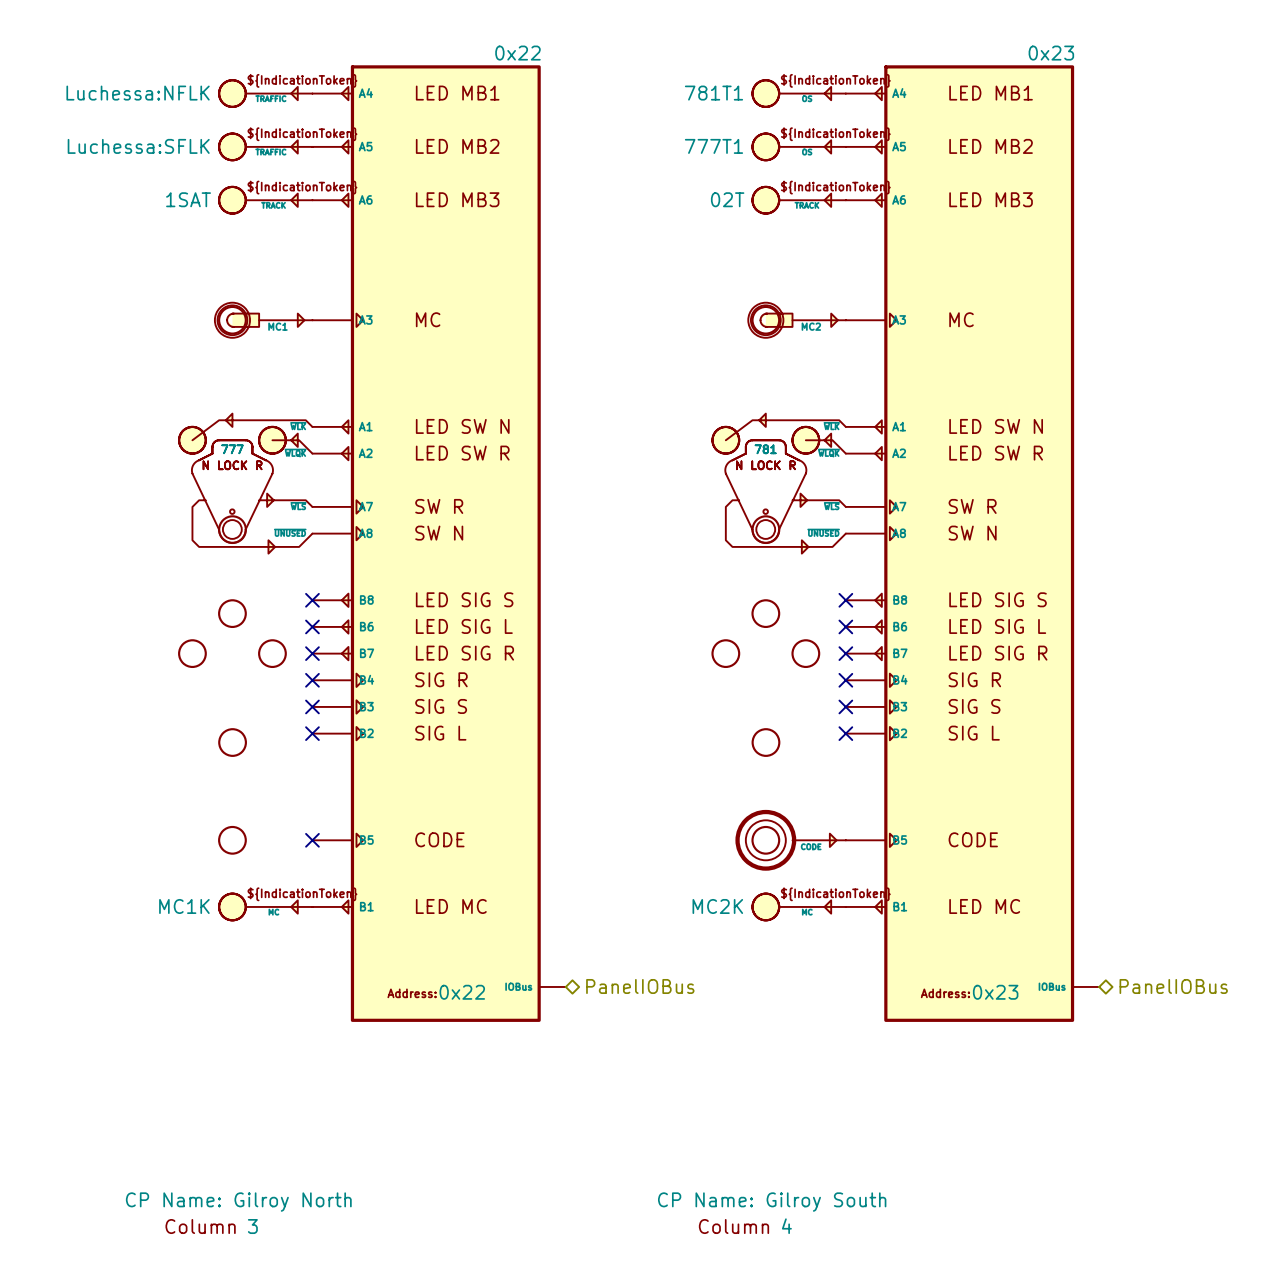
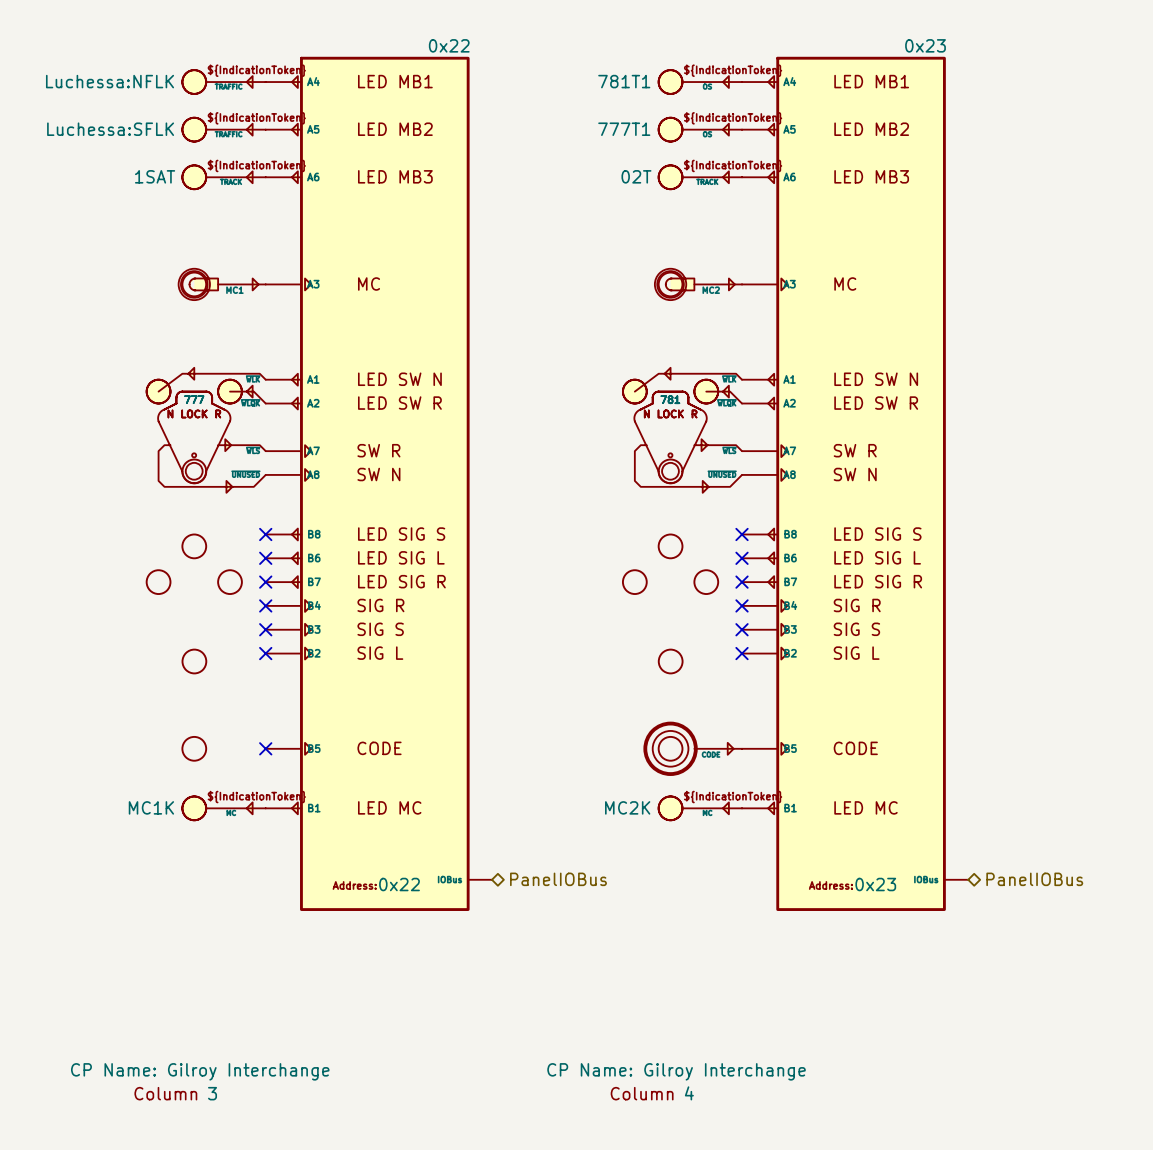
part text: CP Name: Gilroy North (238, 1202) -> CP Name: Gilroy Interchange (200, 1071)
part text: CP Name: Gilroy South (772, 1202) -> CP Name: Gilroy Interchange (676, 1071)

